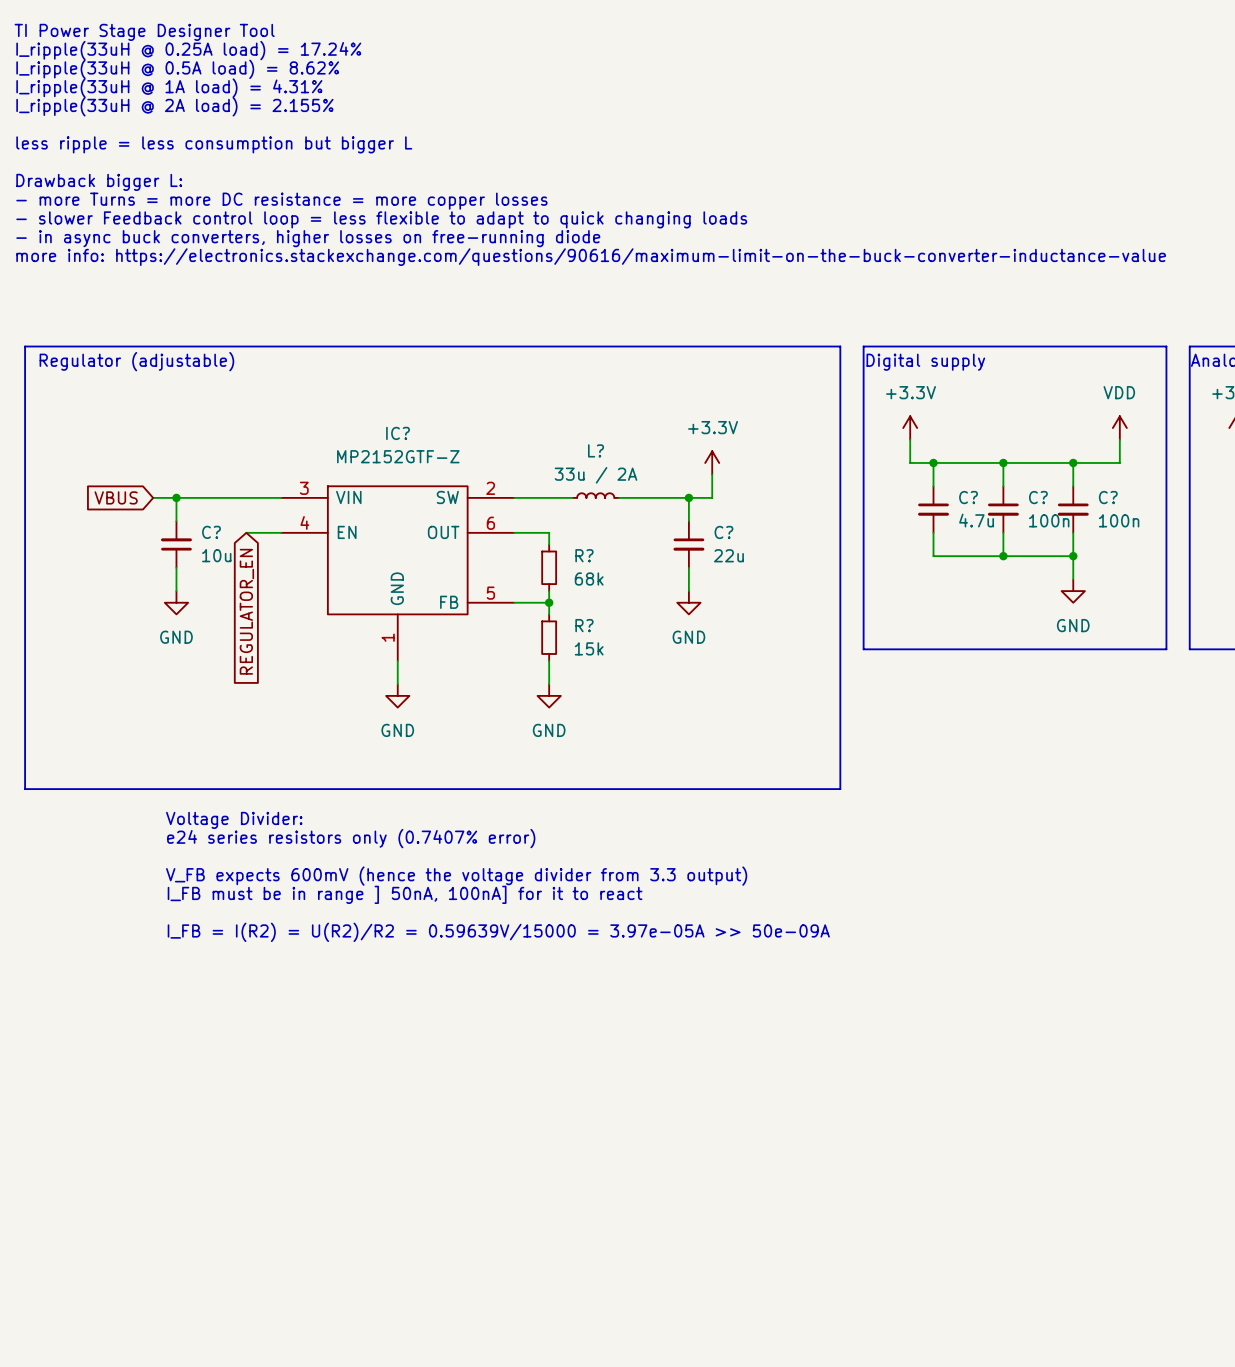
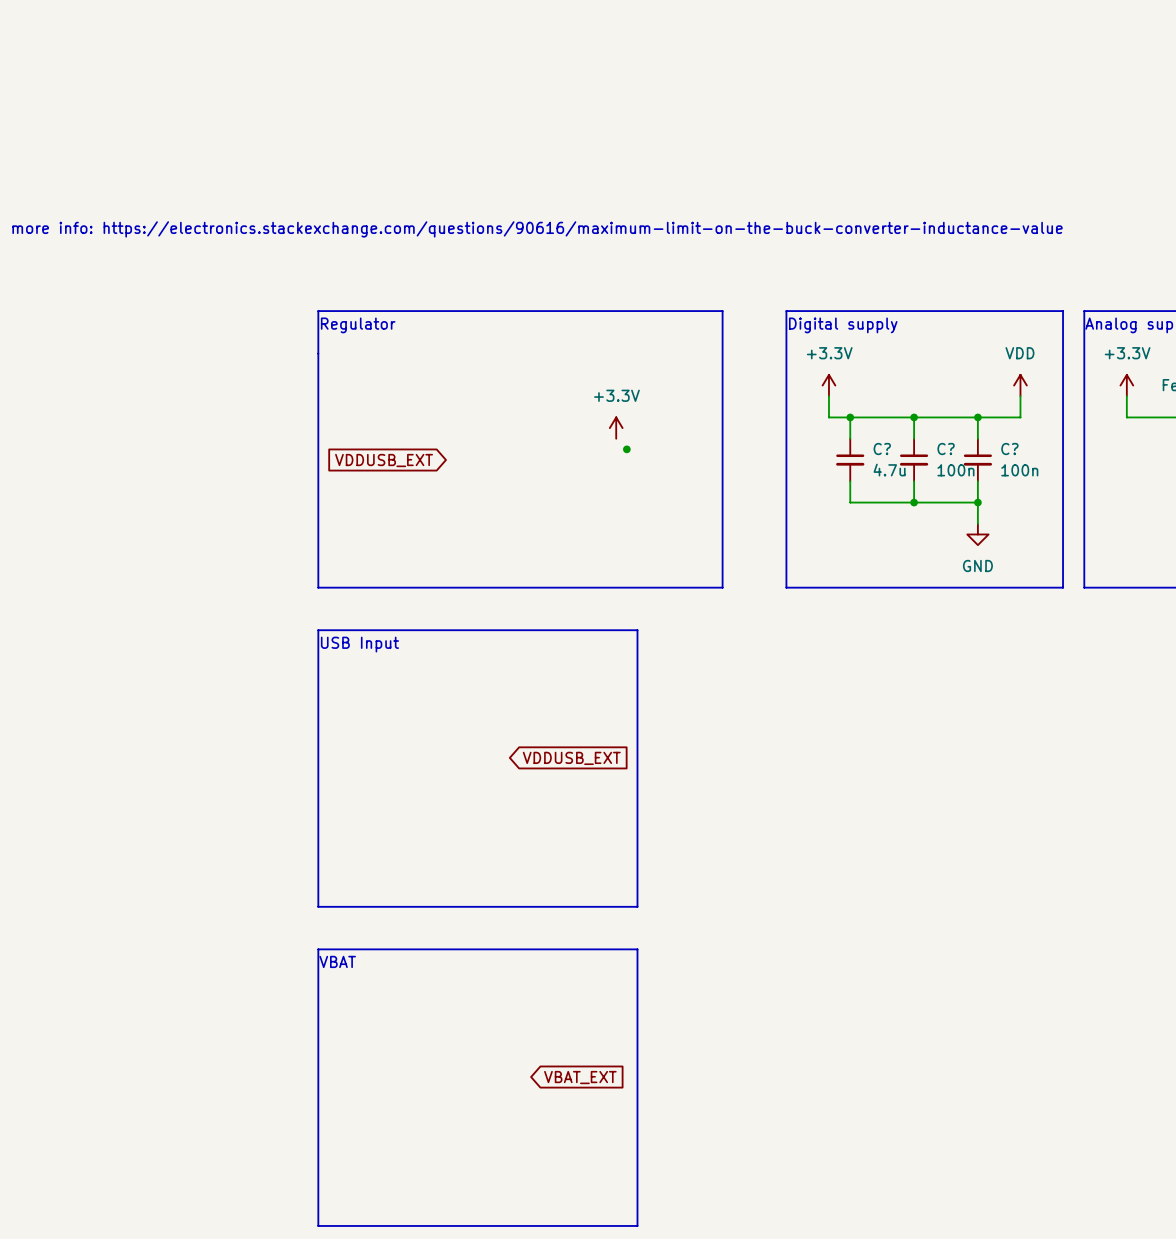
text: TI Power Stage Designer Tool (144, 32) -> none
text: I_ripple(33uH @ 0.25A load) = 17.24% (188, 50) -> none
text: I_ripple(33uH @ 0.5A load) = 8.62% (177, 69) -> none
text: I_ripple(33uH @ 1A load) = 4.31% (169, 88) -> none
text: I_ripple(33uH @ 2A load) = 2.155% (174, 106) -> none
text: less ripple = less consumption but bigger L (214, 144) -> none
text: Drawback bigger L: (99, 182) -> none
text: - more Turns = more DC resistance = more copper losses (281, 201) -> none
text: - slower Feedback control loop = less flexible to adapt to quick changing loads (381, 219) -> none
text: - in async buck converters, higher losses on free-running diode (308, 238) -> none
line: (351, 346) (25, 346) (25, 789) (840, 789) (840, 346) (793, 346) -> (318, 311) (318, 587) (722, 587) (722, 311)
text: Regulator (adjustable) (136, 361) -> none
text: none -> Regulator (358, 325)
power symbol position: +3.3V (712, 462) -> +3.3V (616, 428)
wire: (712, 474) (712, 497) (619, 497) -> none
L?: 33u / 2A (595, 495) -> none
global label: VBUS (116, 497) -> none
wire: (153, 497) (281, 497) -> none
wire: (176, 497) (176, 521) -> none
junction: (176, 497) -> none
wire: (514, 497) (572, 497) -> none
wire: (688, 497) (688, 521) -> none
global label: none -> VDDUSB_EXT (384, 460)
wire: (246, 532) (281, 532) -> none
wire: (514, 532) (549, 532) (549, 544) -> none
C?: 10u (176, 544) -> none
C?: 22u (688, 544) -> none
wire: (176, 567) (176, 591) -> none
R?: 68k (549, 567) -> none
wire: (688, 567) (688, 591) -> none
IC?: MP2152GTF-Z (397, 573) -> none
wire: (549, 591) (549, 614) -> none
power symbol: GND (176, 602) -> none
wire: (514, 602) (549, 602) -> none
junction: (549, 602) -> none
power symbol: GND (688, 602) -> none
global label: REGULATOR_EN (246, 611) -> none
R?: 15k (549, 637) -> none
wire: (397, 660) (397, 684) -> none
wire: (549, 660) (549, 684) -> none
line: none -> (318, 630) (318, 906) (637, 906) (637, 630) (318, 630)
power symbol: GND (397, 695) -> none
power symbol: GND (549, 695) -> none
text: none -> USB Input (359, 644)
text: Voltage Divider: (234, 820) -> none
global label: none -> VDDUSB_EXT (571, 758)
text: e24 series resistors only (0.7407% error) (351, 838) -> none
text: V_FB expects 600mV (hence the voltage divider from 3.3 output) (456, 876) -> none
text: I_FB must be in range ] 50nA, 100nA] for it to react (405, 894) -> none
text: I_FB = I(R2) = U(R2)/R2 = 0.59639V/15000 = 3.97e-05A >> 50e-09A (498, 932) -> none
line: none -> (318, 949) (318, 1225) (637, 1225) (637, 949) (318, 949)
text: none -> VBAT (337, 961)
global label: none -> VBAT_EXT (580, 1077)

